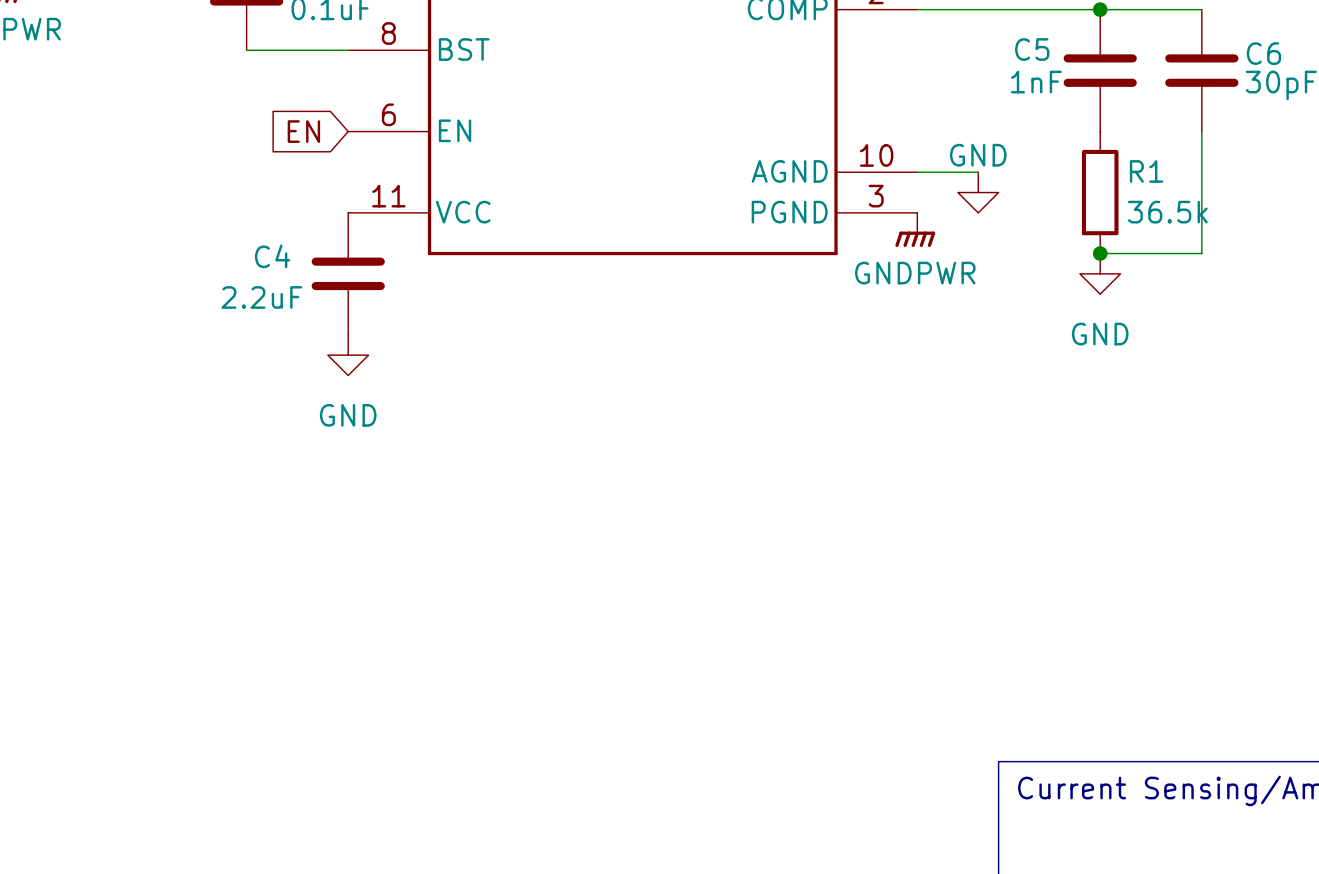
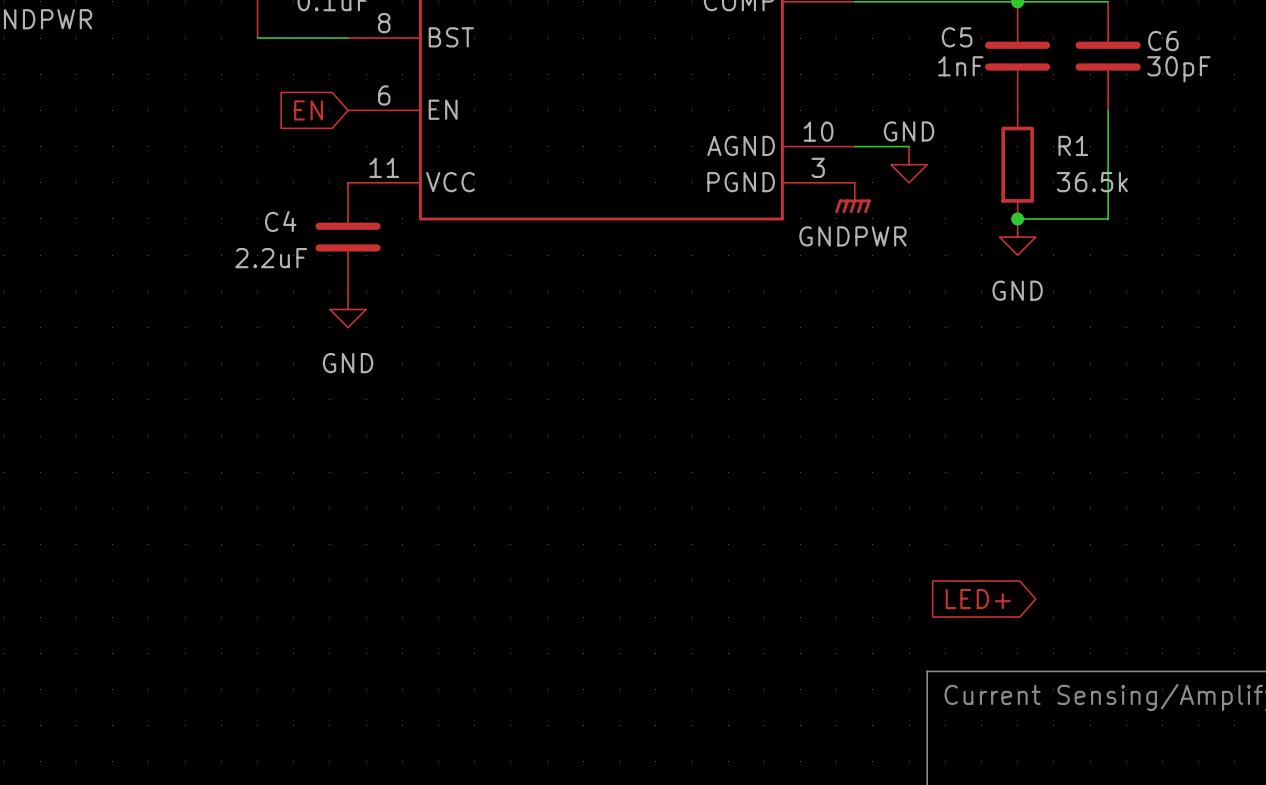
R1 name position: R1 (1146, 171) -> R1 (1073, 145)
R1 value position: 36.5k (1167, 212) -> 36.5k (1092, 182)
global label: none -> LED+ (978, 599)

